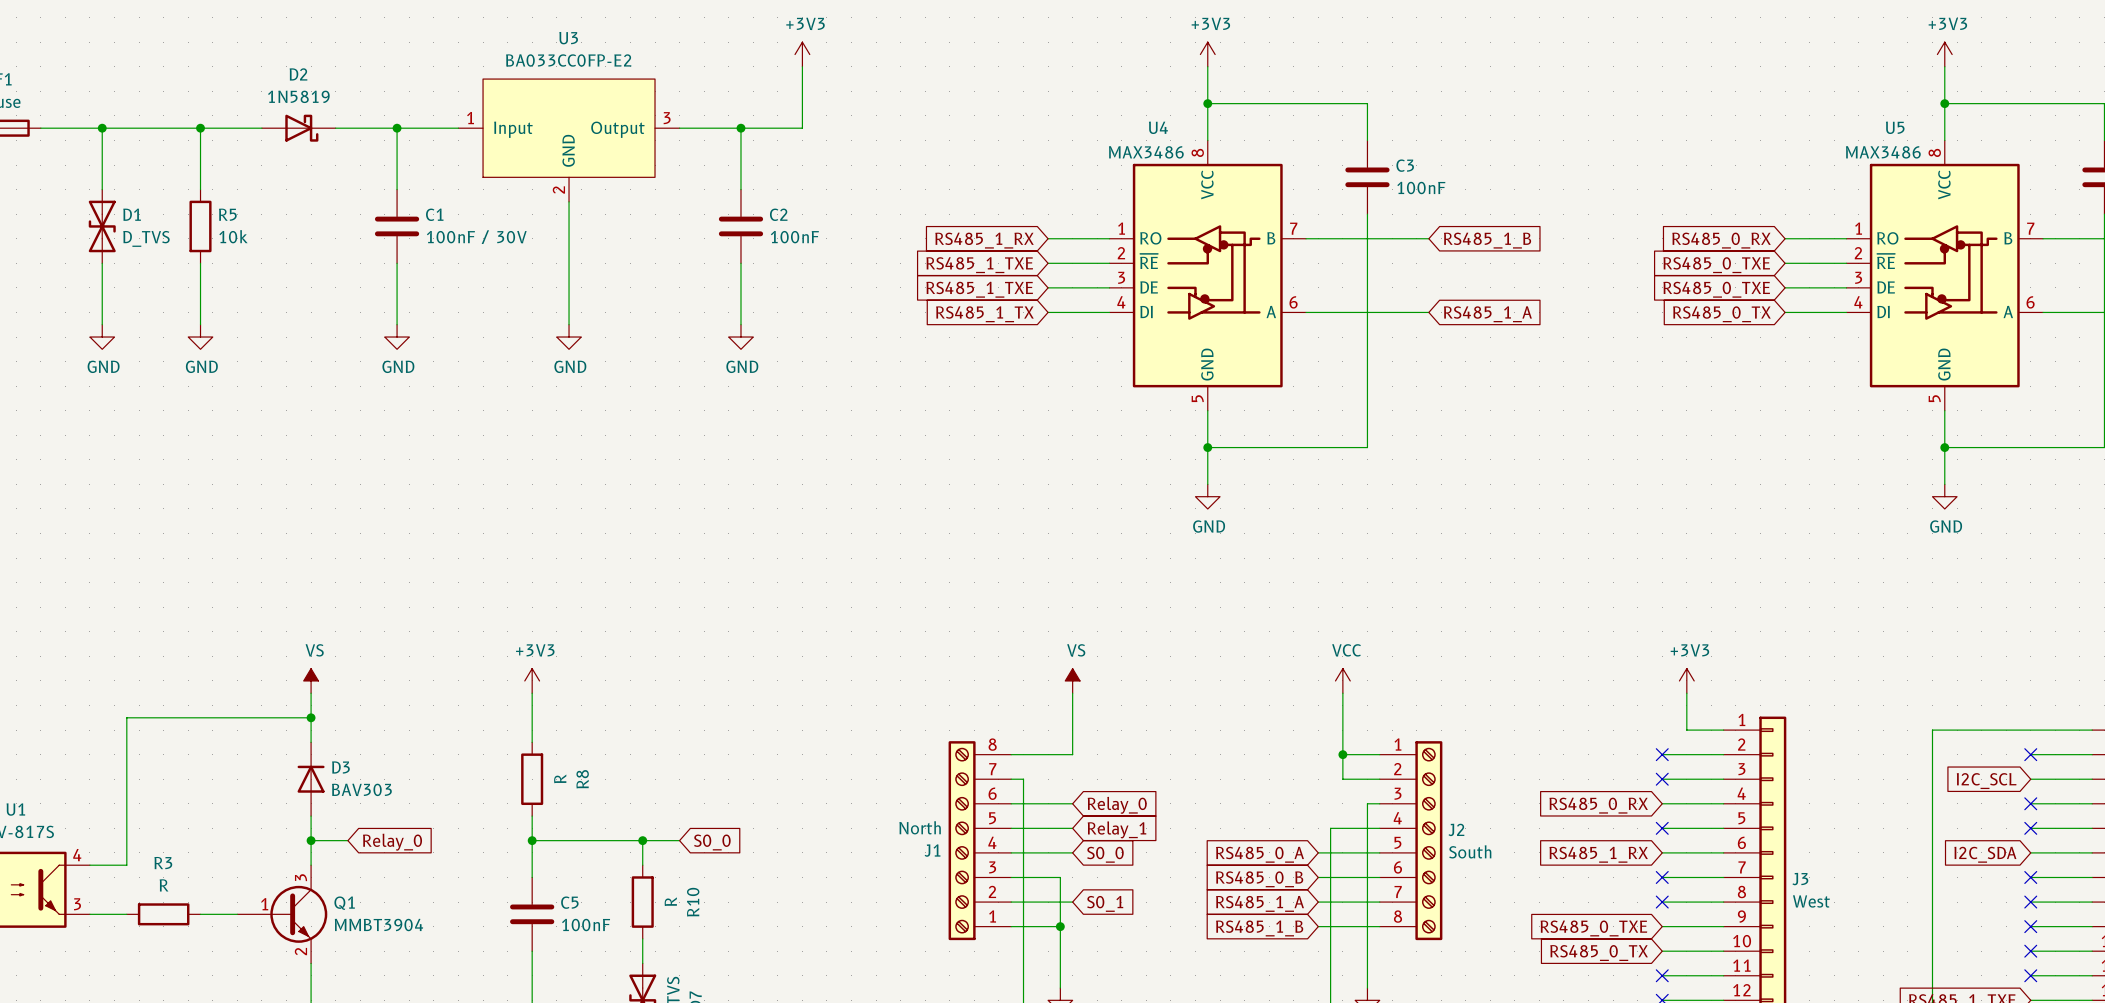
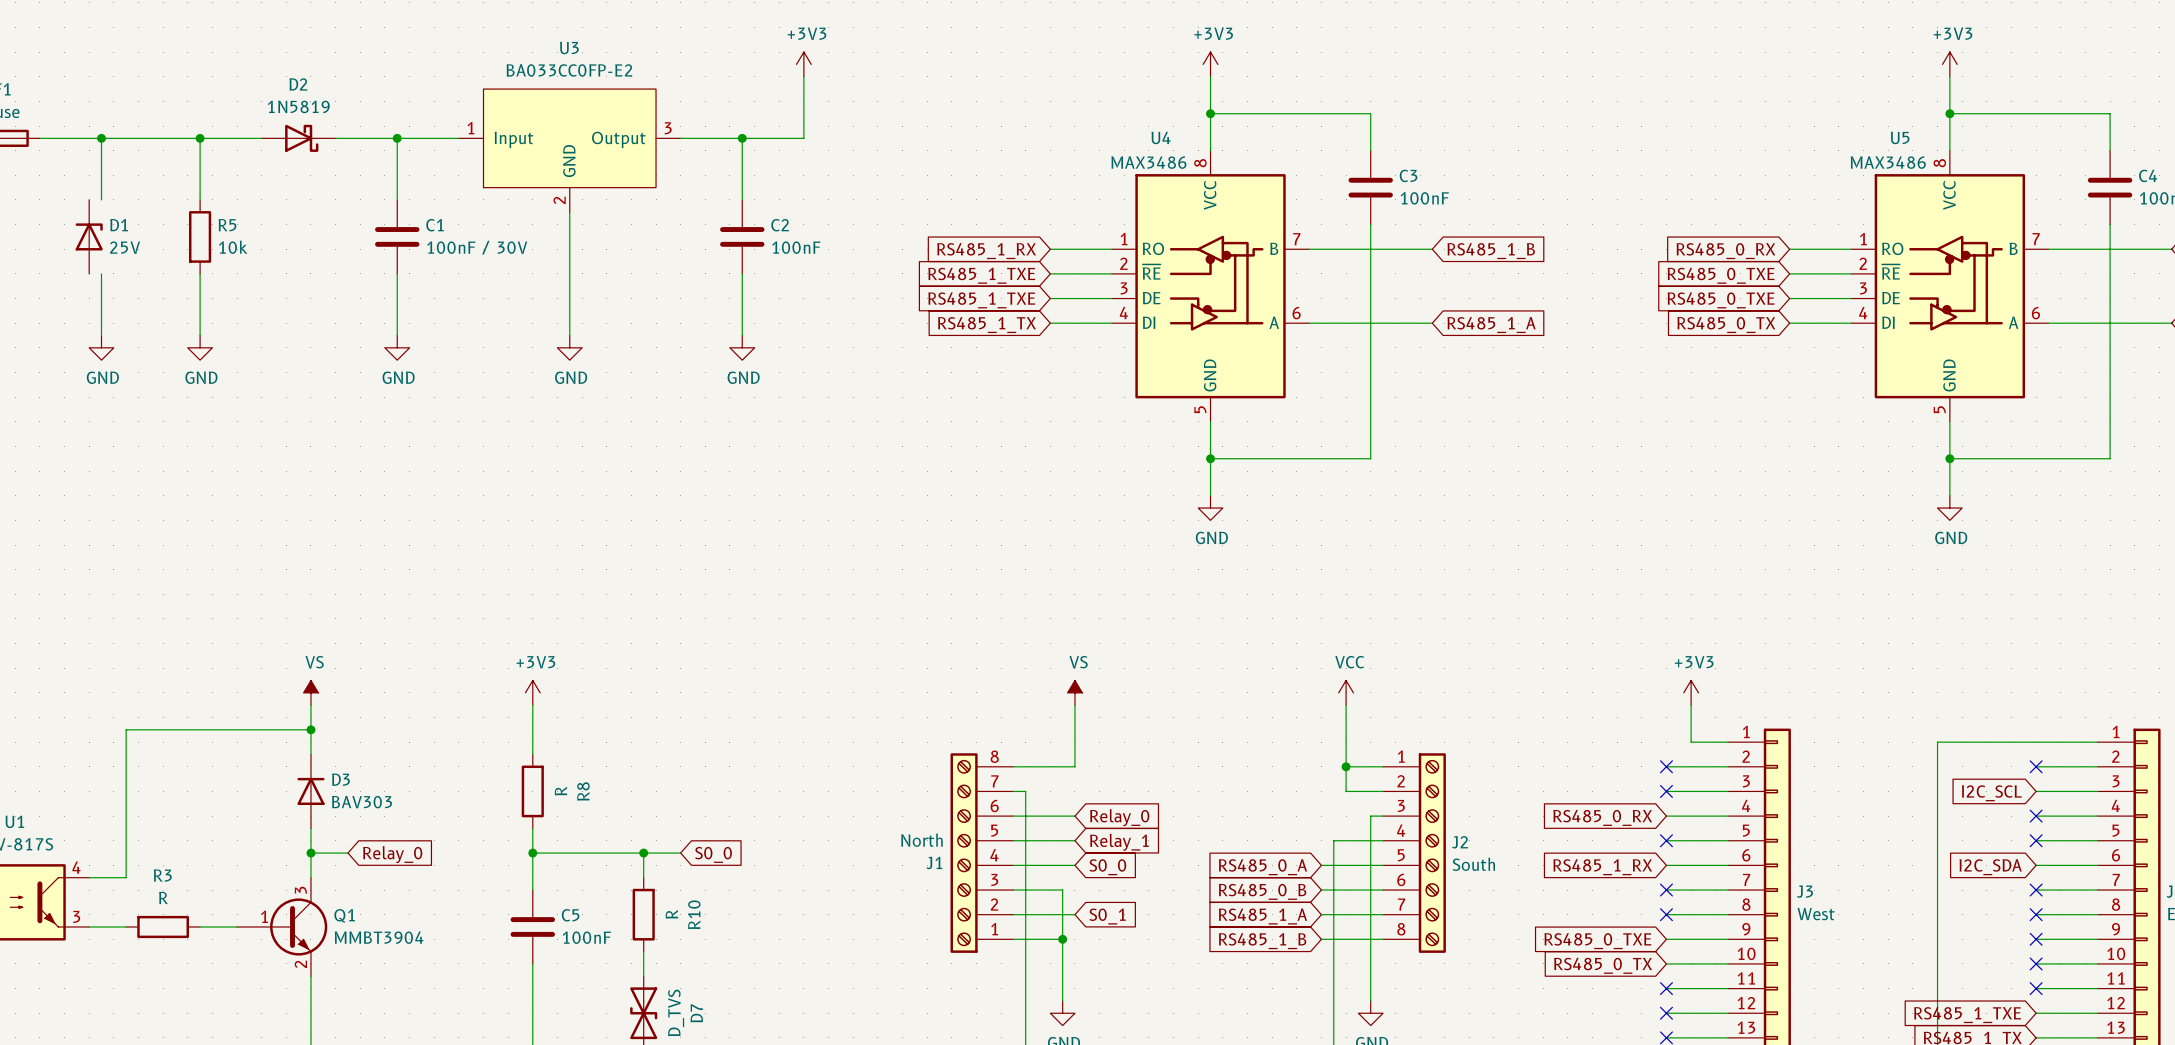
D1 symbol: [88, 189, 116, 264] -> [75, 199, 103, 274]
D1 value: D_TVS (146, 238) -> 25V (125, 247)

